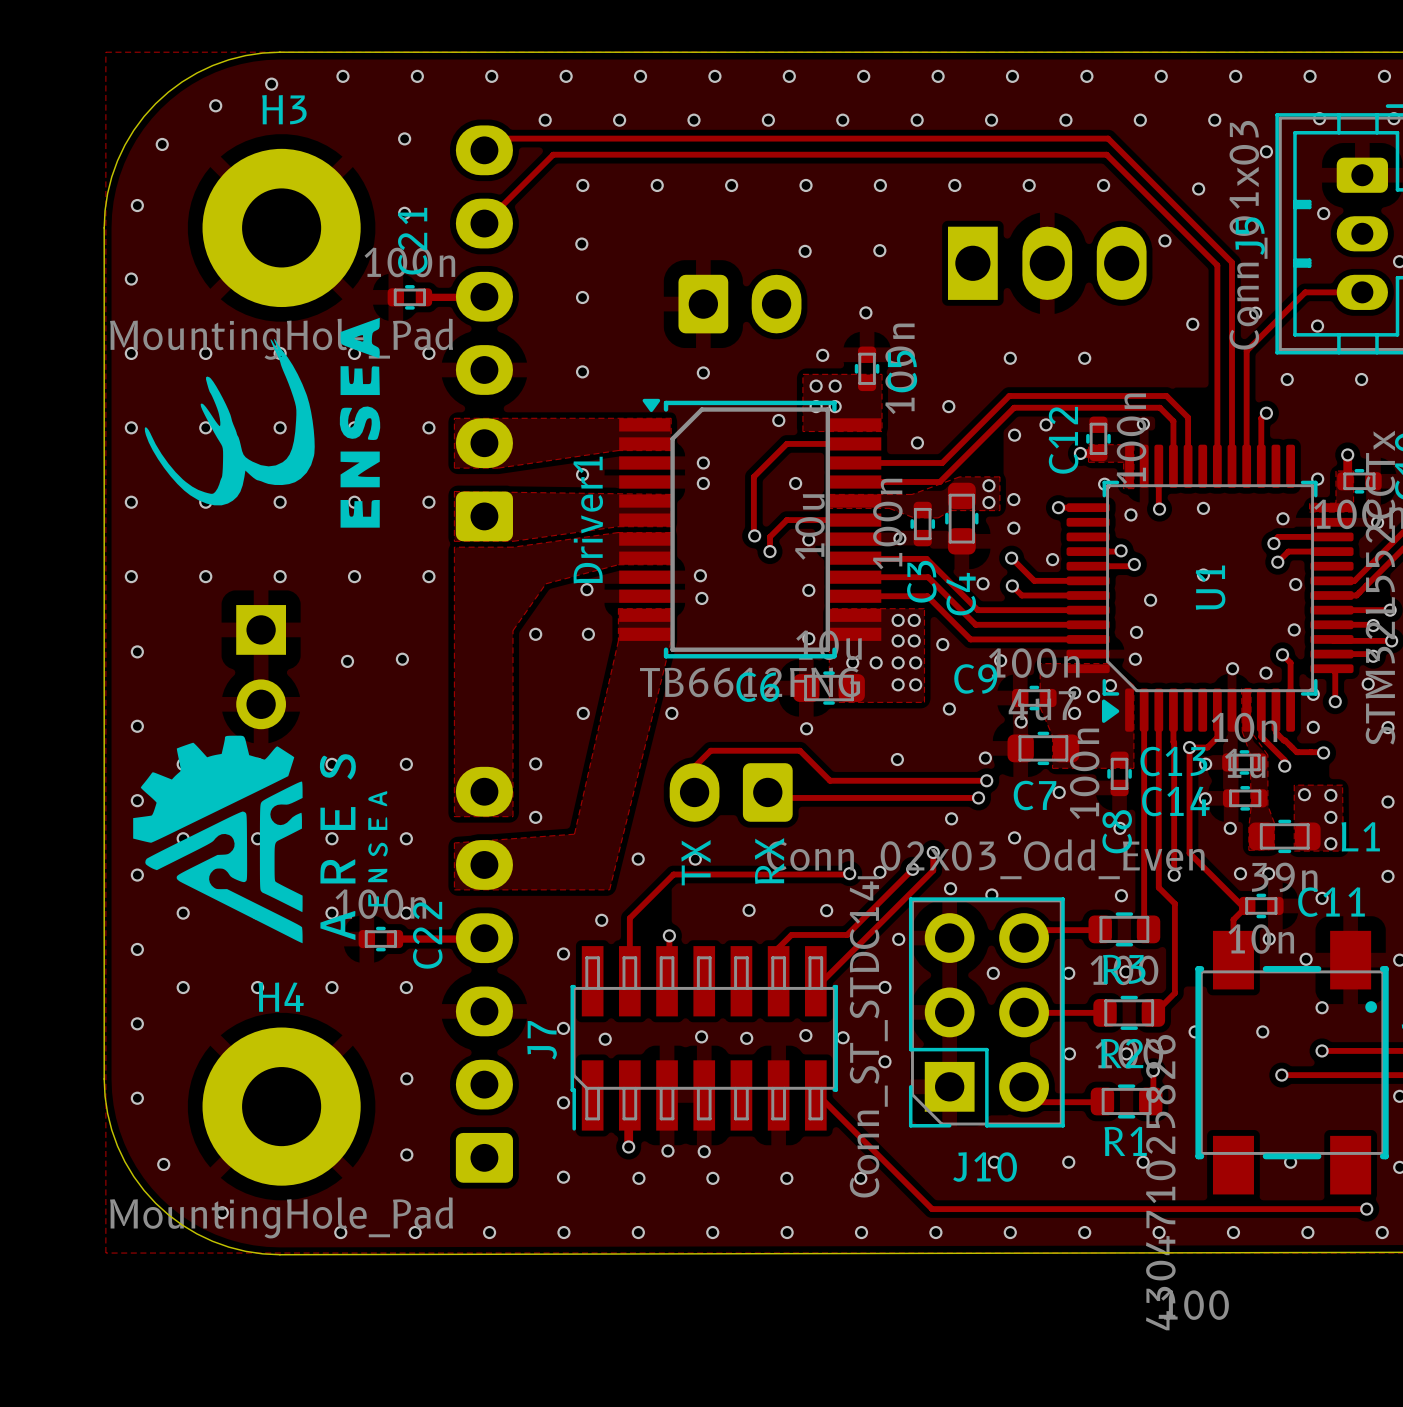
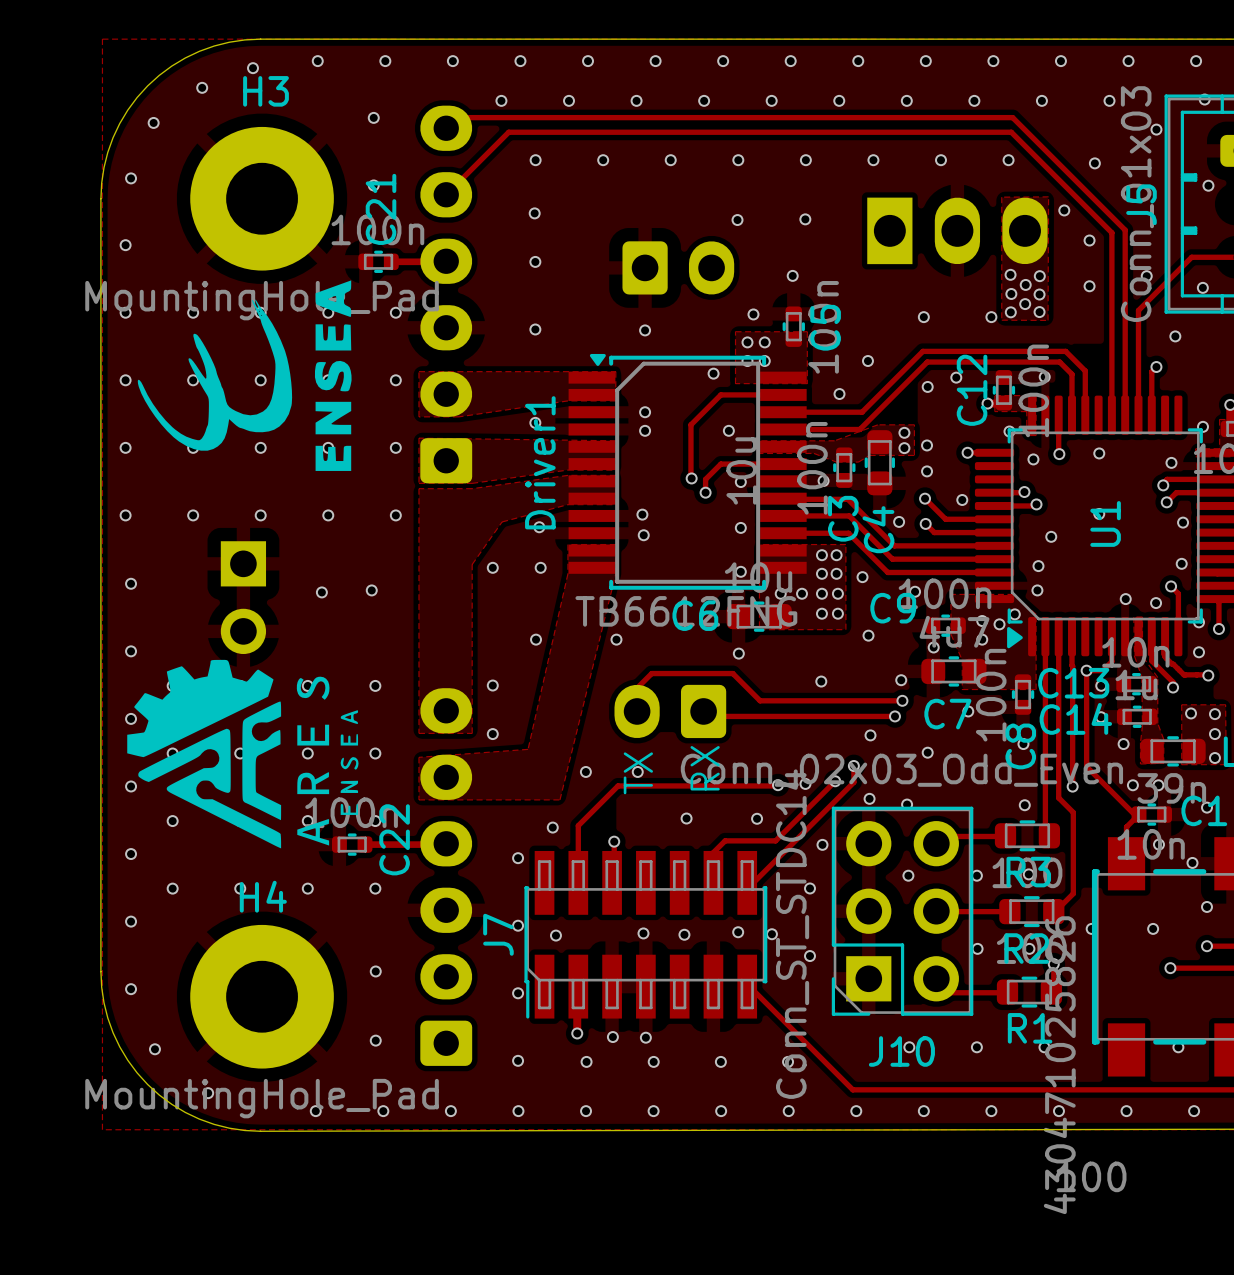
zone outline: none -> (1048, 196) (1048, 320) (1001, 320) (1001, 197) (1048, 196)
via: none -> (1089, 240)
via: none -> (1010, 274)
via: none -> (1039, 276)
via: none -> (1025, 284)
via: none -> (1011, 293)
via: none -> (1039, 294)
via: none -> (1025, 304)
via: none -> (1039, 312)
via: none -> (1010, 312)

